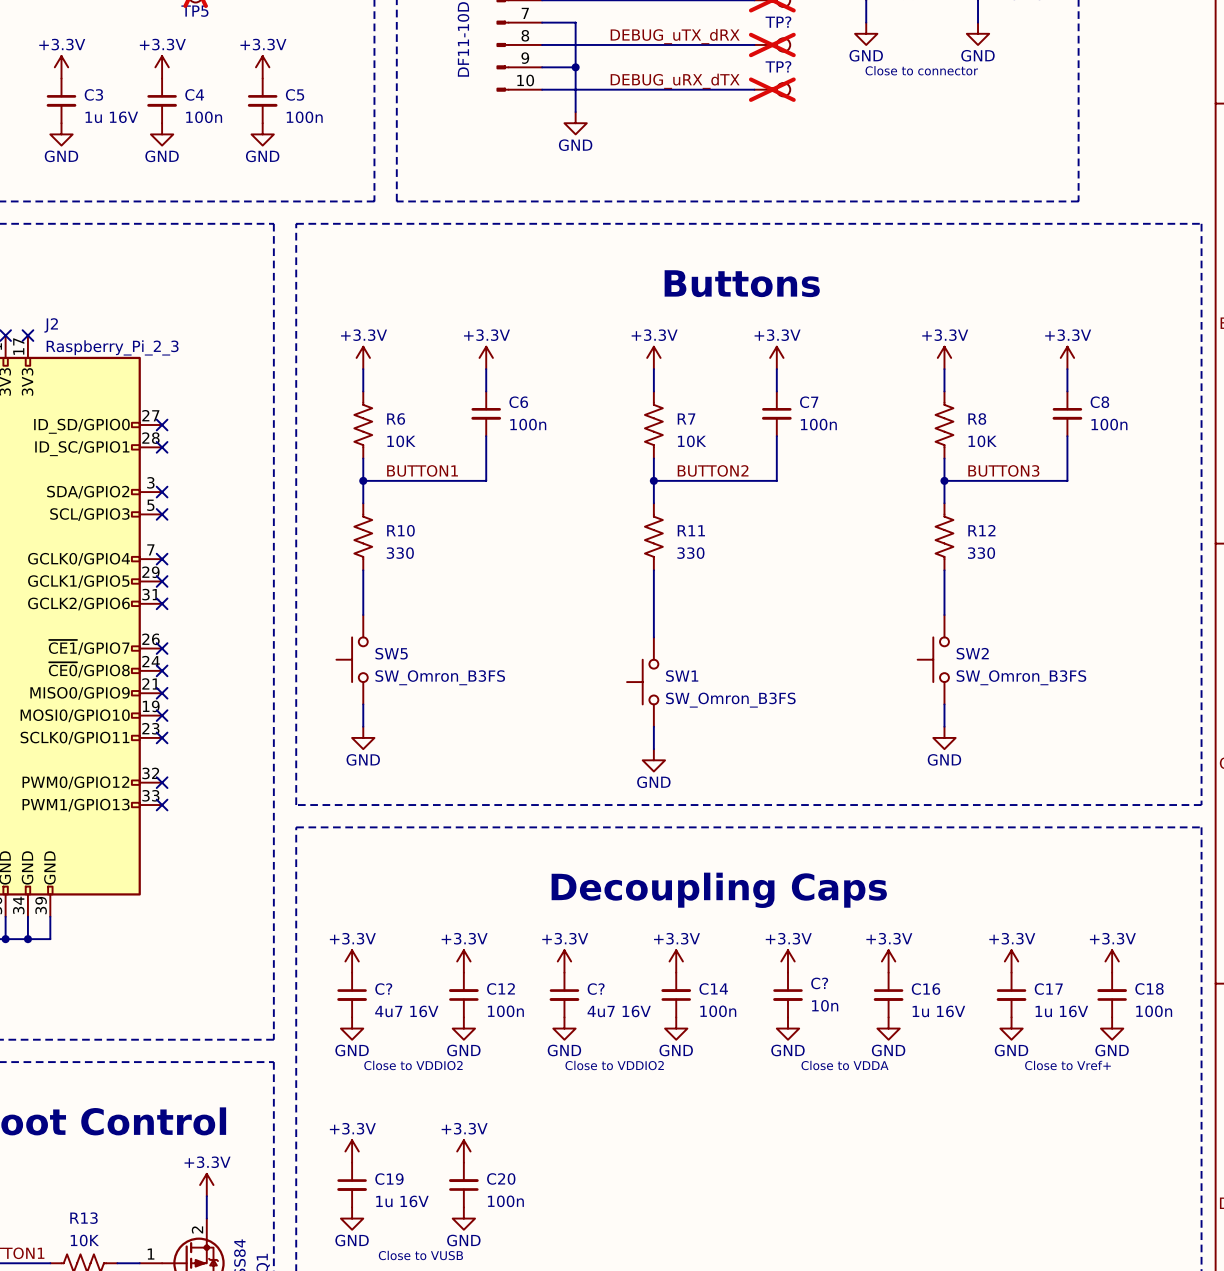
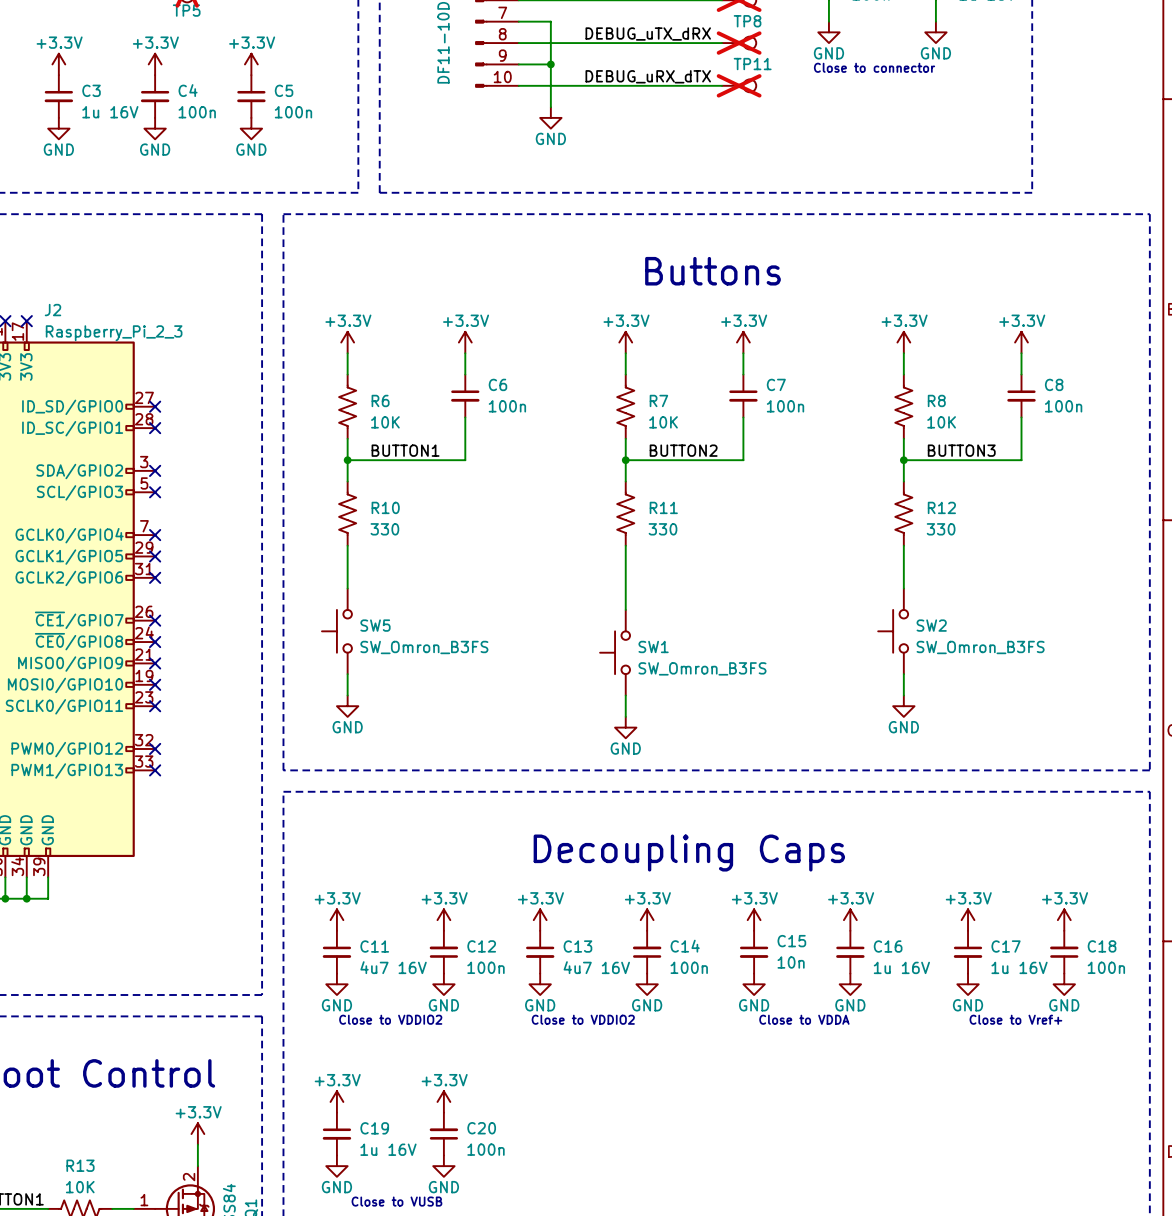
TP? name: TP? (778, 22) -> TP8 (747, 21)
TP? name: TP? (778, 66) -> TP11 (752, 64)
C? name: C? (819, 983) -> C15 (791, 941)
C? name: C? (383, 989) -> C11 (374, 946)
C? name: C? (596, 989) -> C13 (577, 946)

